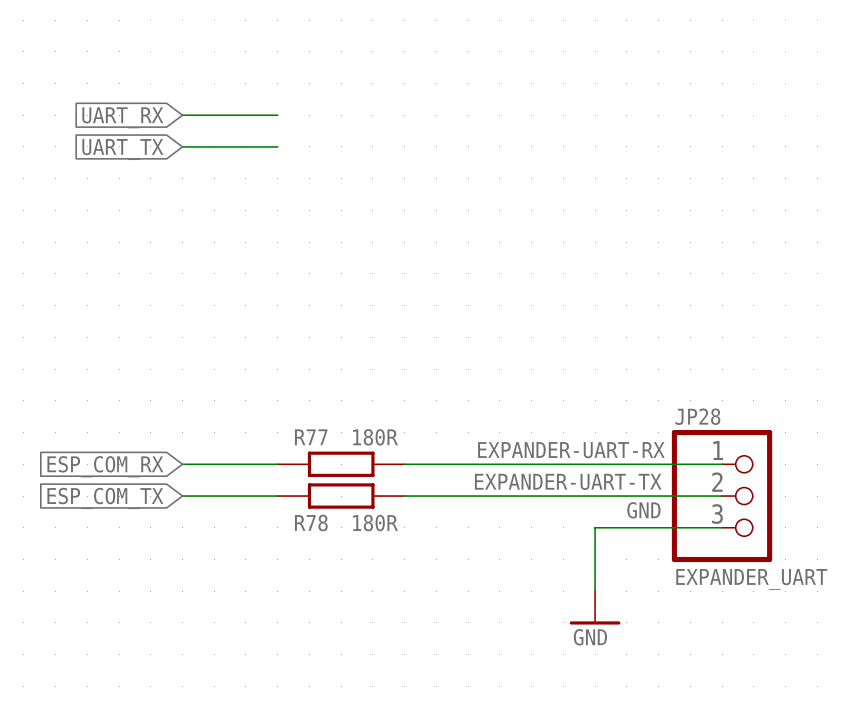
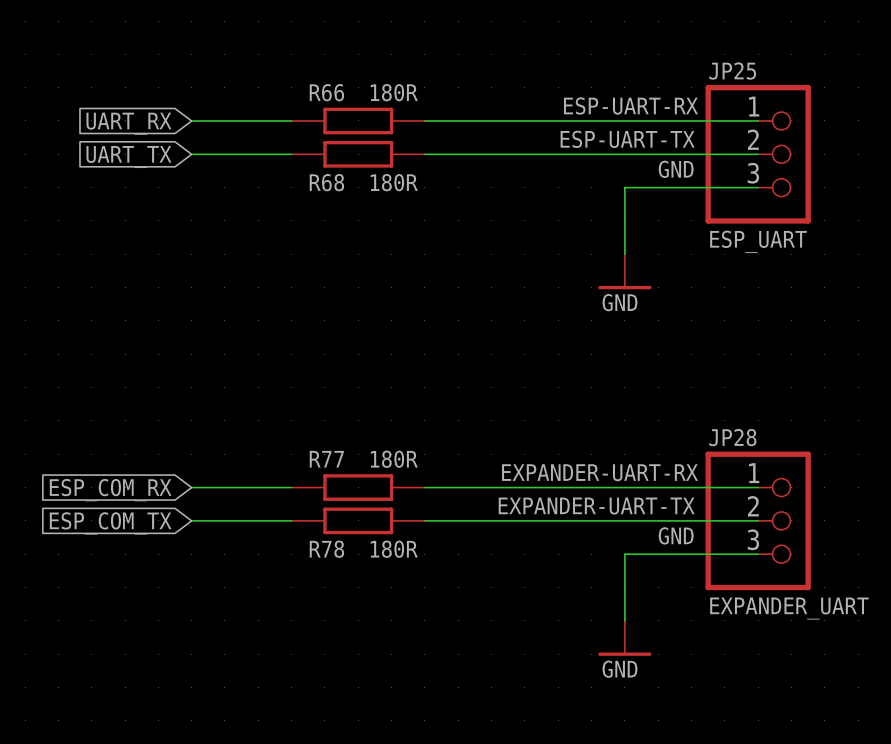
label: none -> ESP-UART-RX (630, 106)
R66: none -> 180R (358, 120)
wire: none -> (424, 120) (758, 120)
label: none -> ESP-UART-TX (627, 139)
R68: none -> 180R (358, 154)
wire: none -> (424, 154) (758, 154)
JP25: none -> ESP_UART (758, 154)
label: none -> GND (676, 169)
wire: none -> (758, 187) (624, 187) (624, 254)
power symbol: none -> GND (624, 271)

